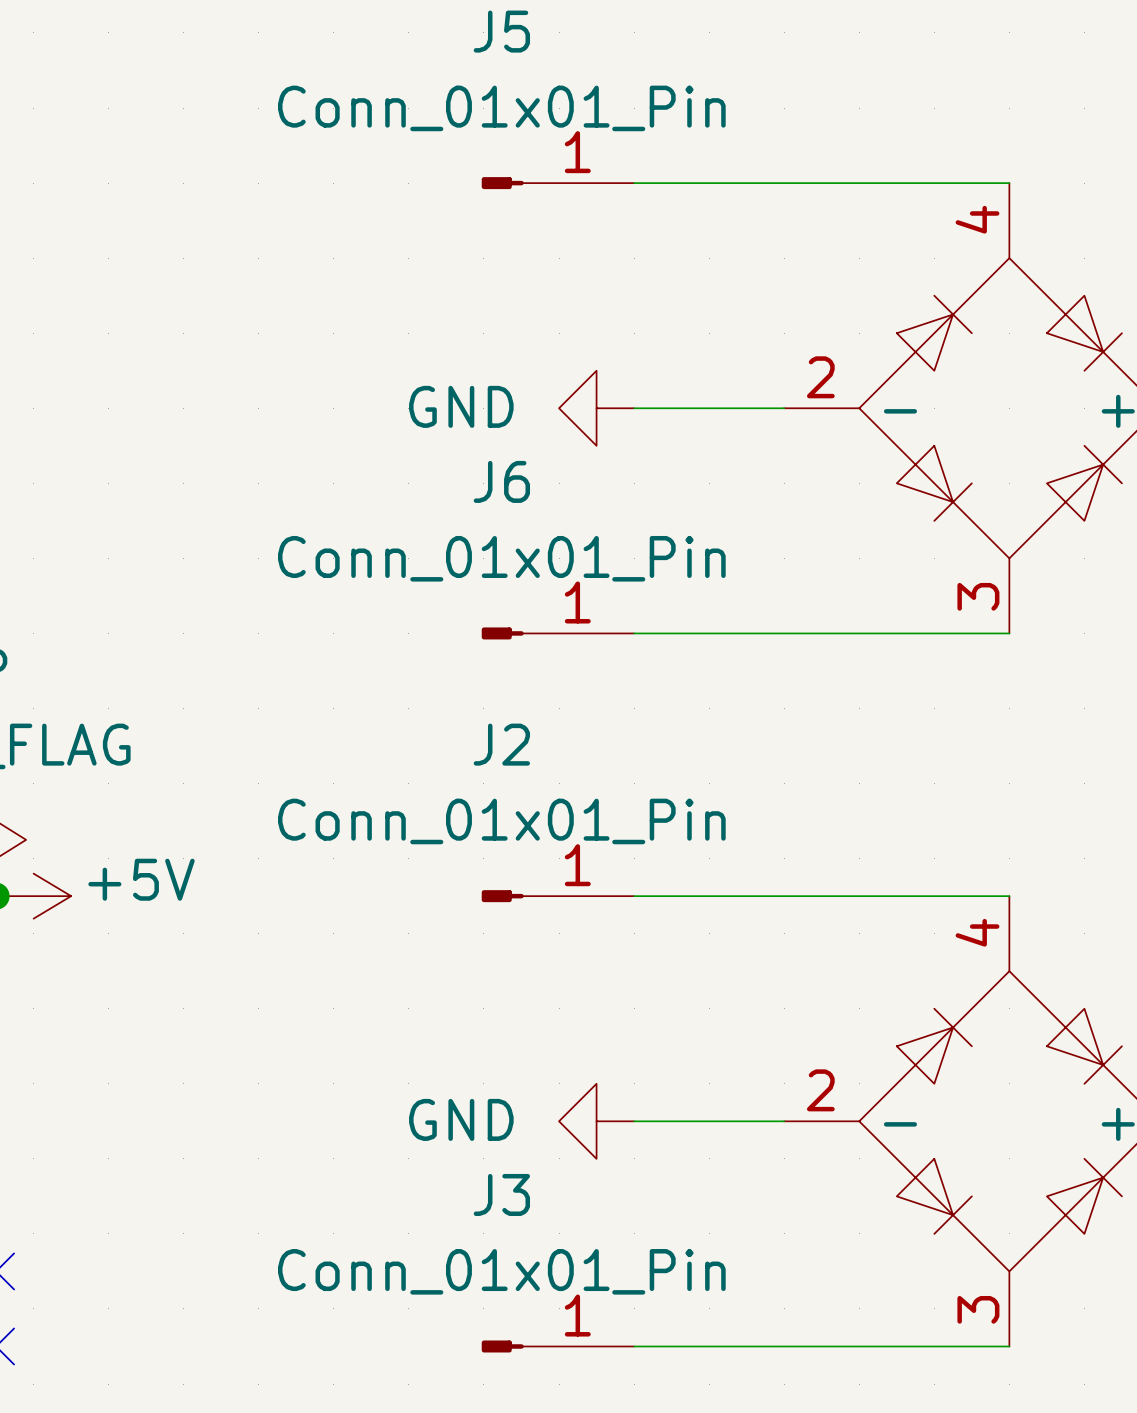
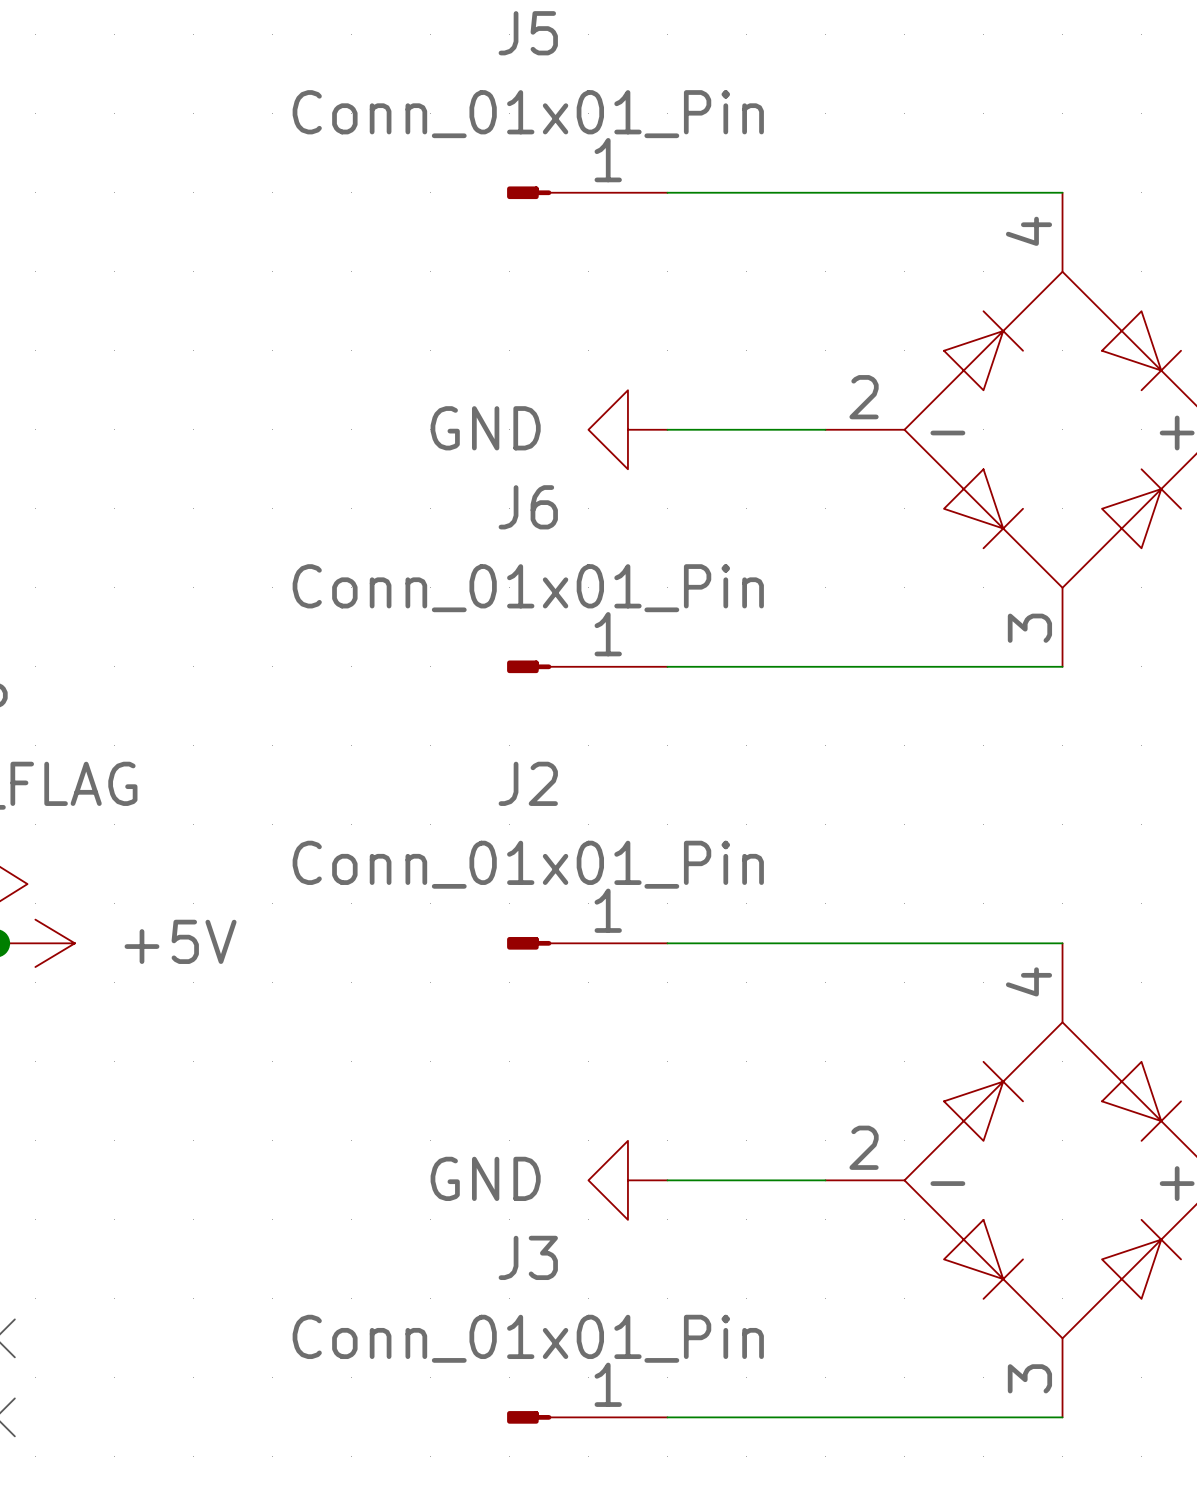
power symbol text position: +5V (141, 879) -> +5V (180, 941)

